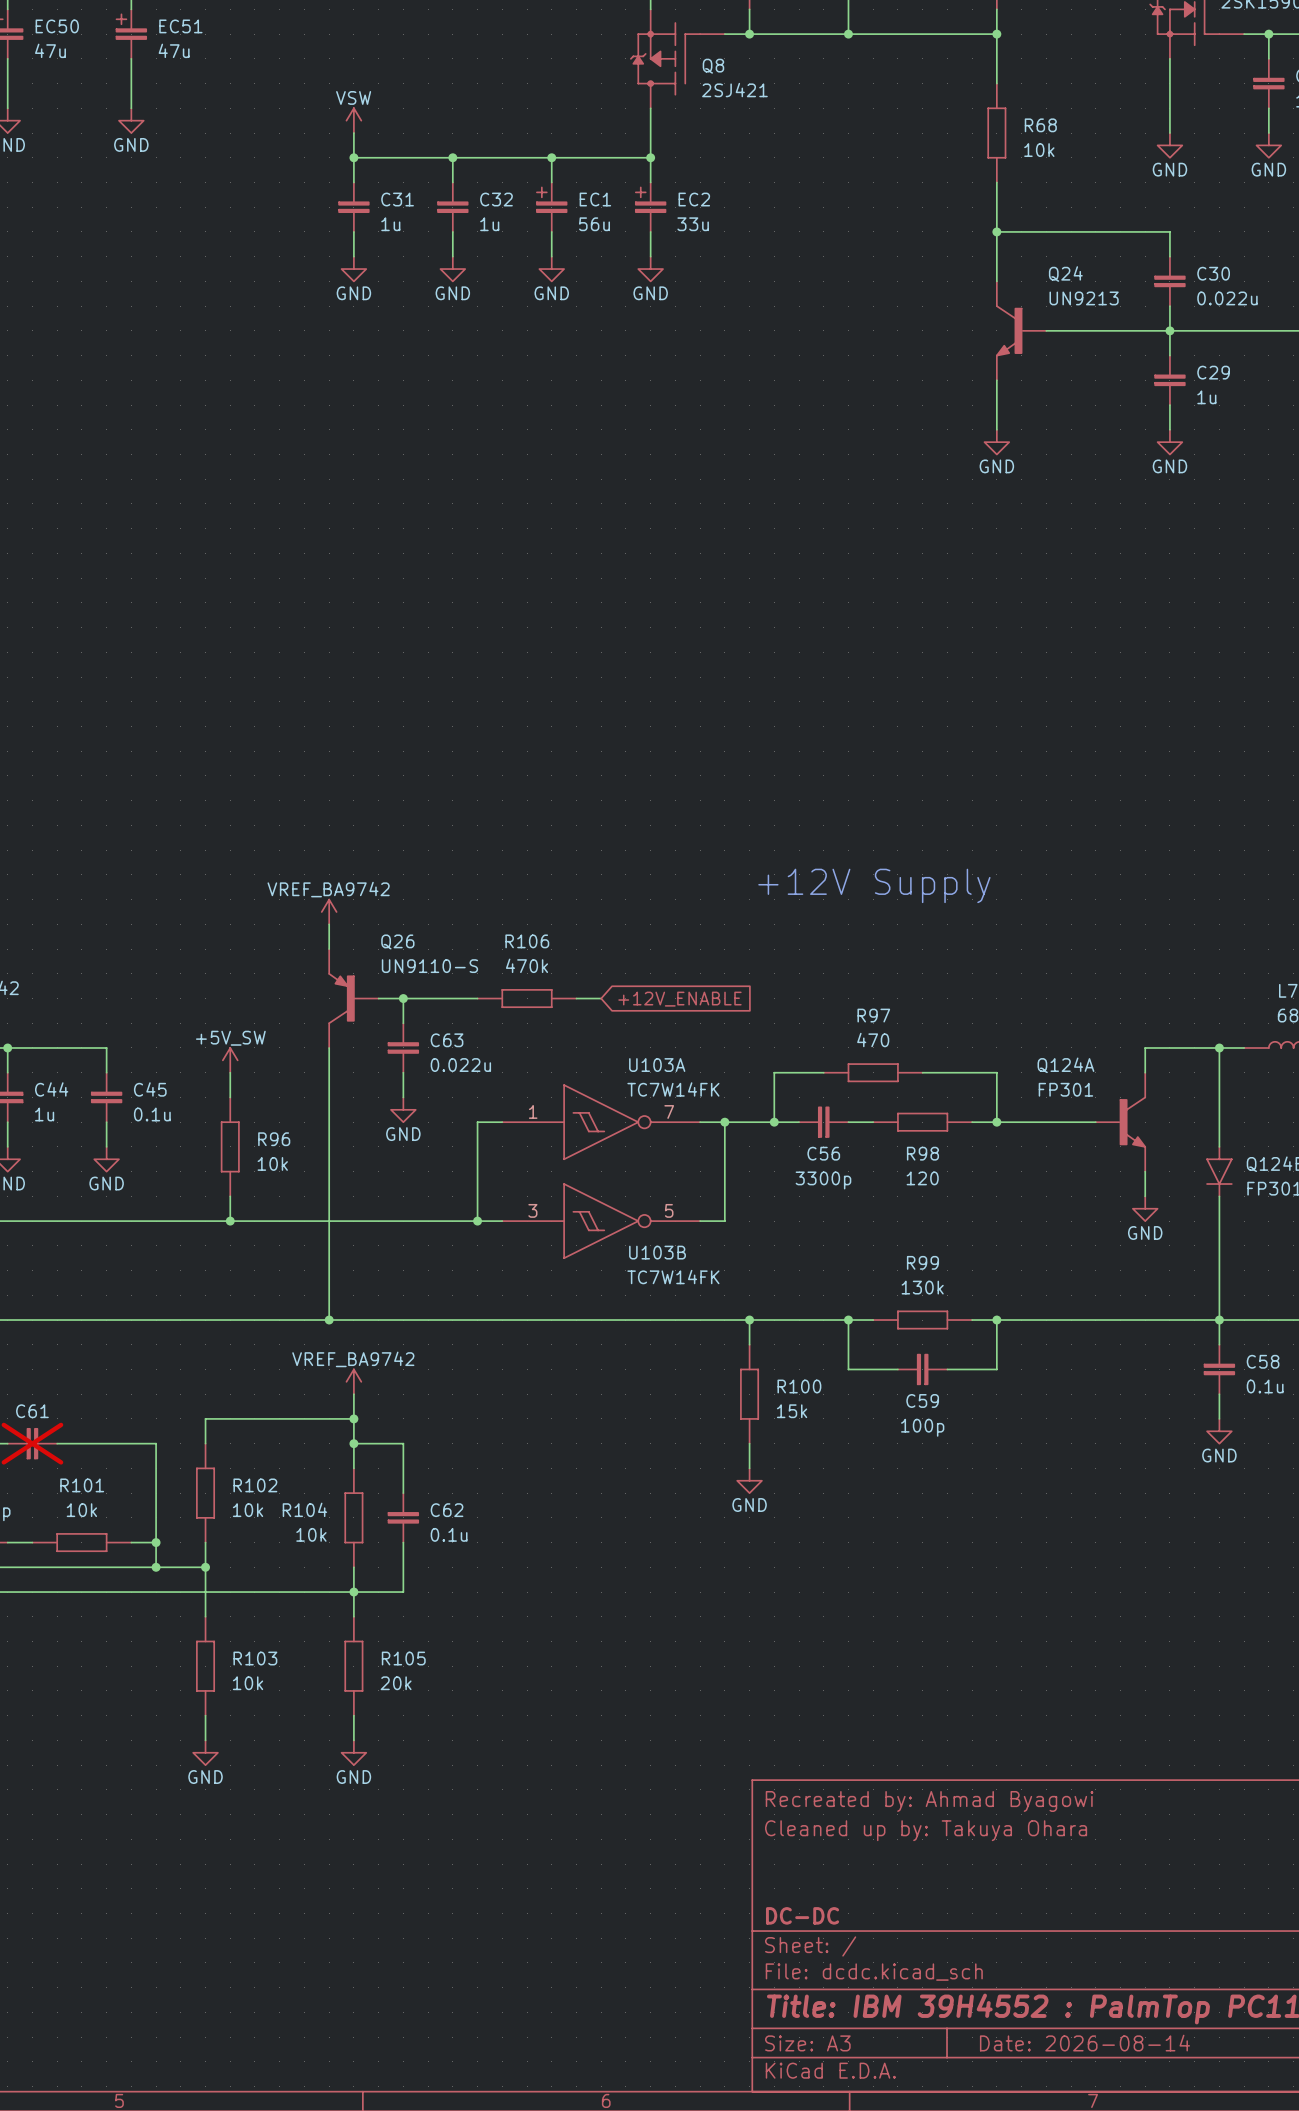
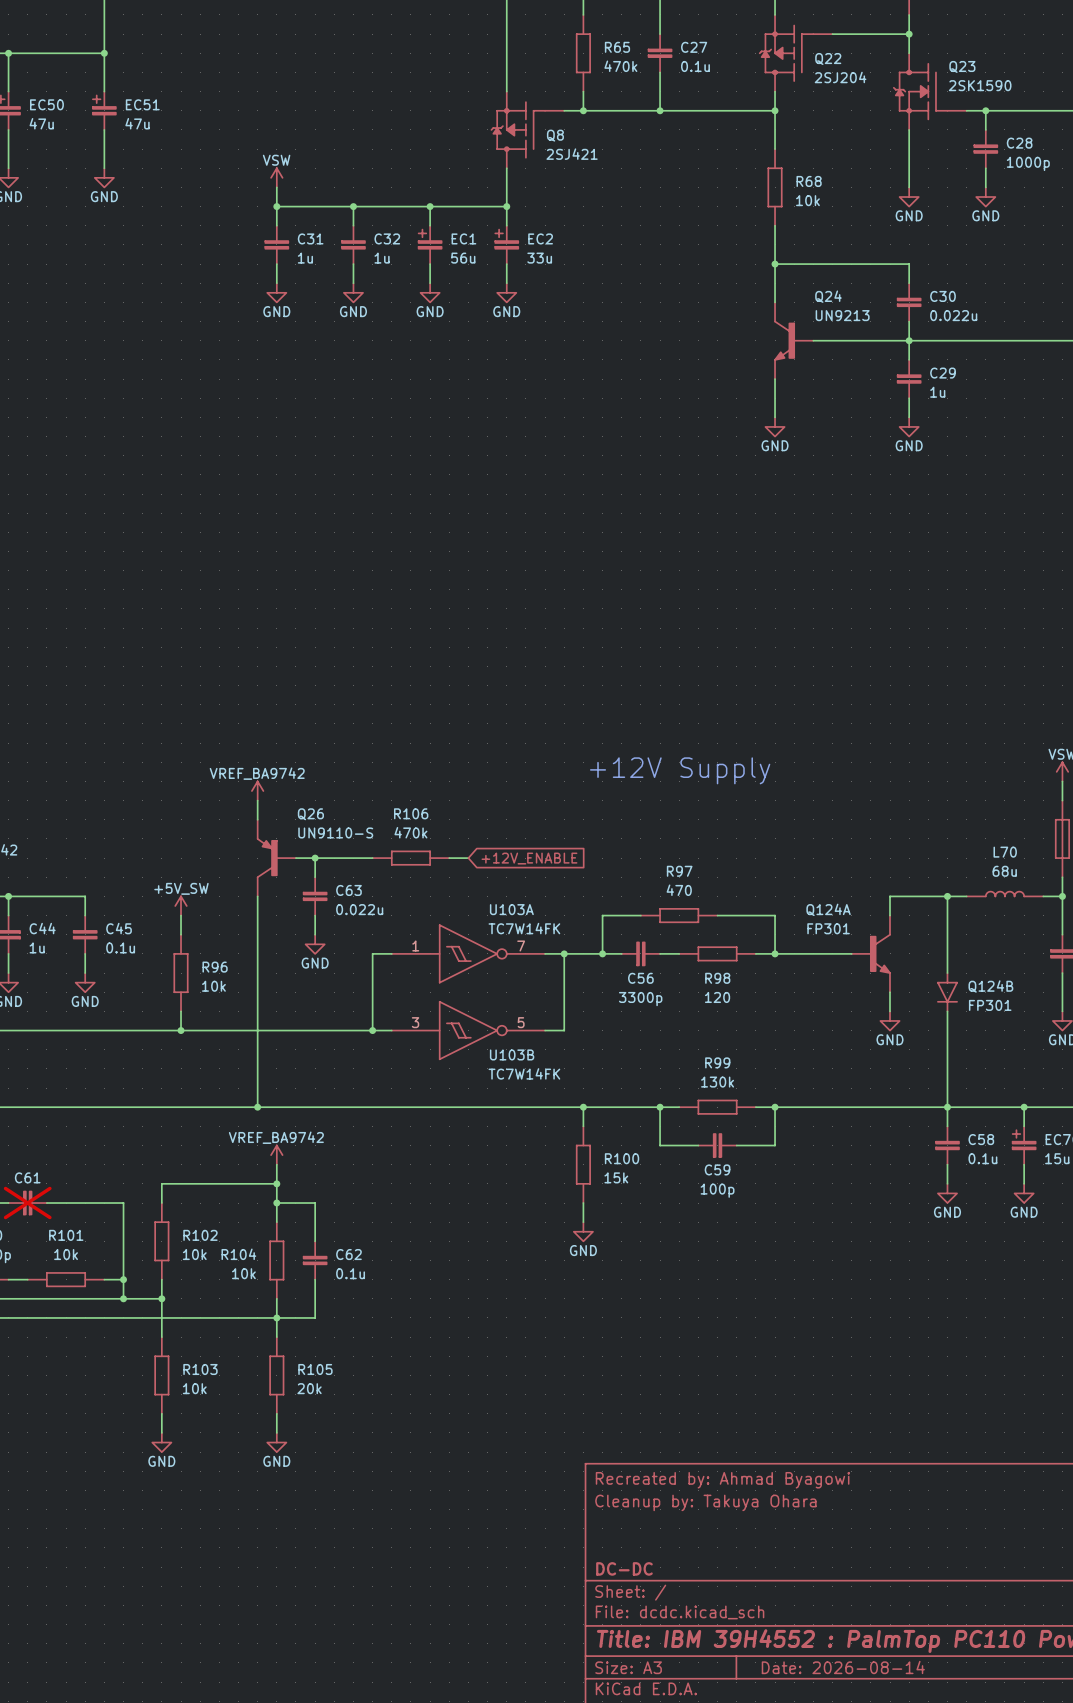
title block: Cleaned up by: Takuya Ohara (926, 1830) -> Cleanup by: Takuya Ohara (705, 1502)

